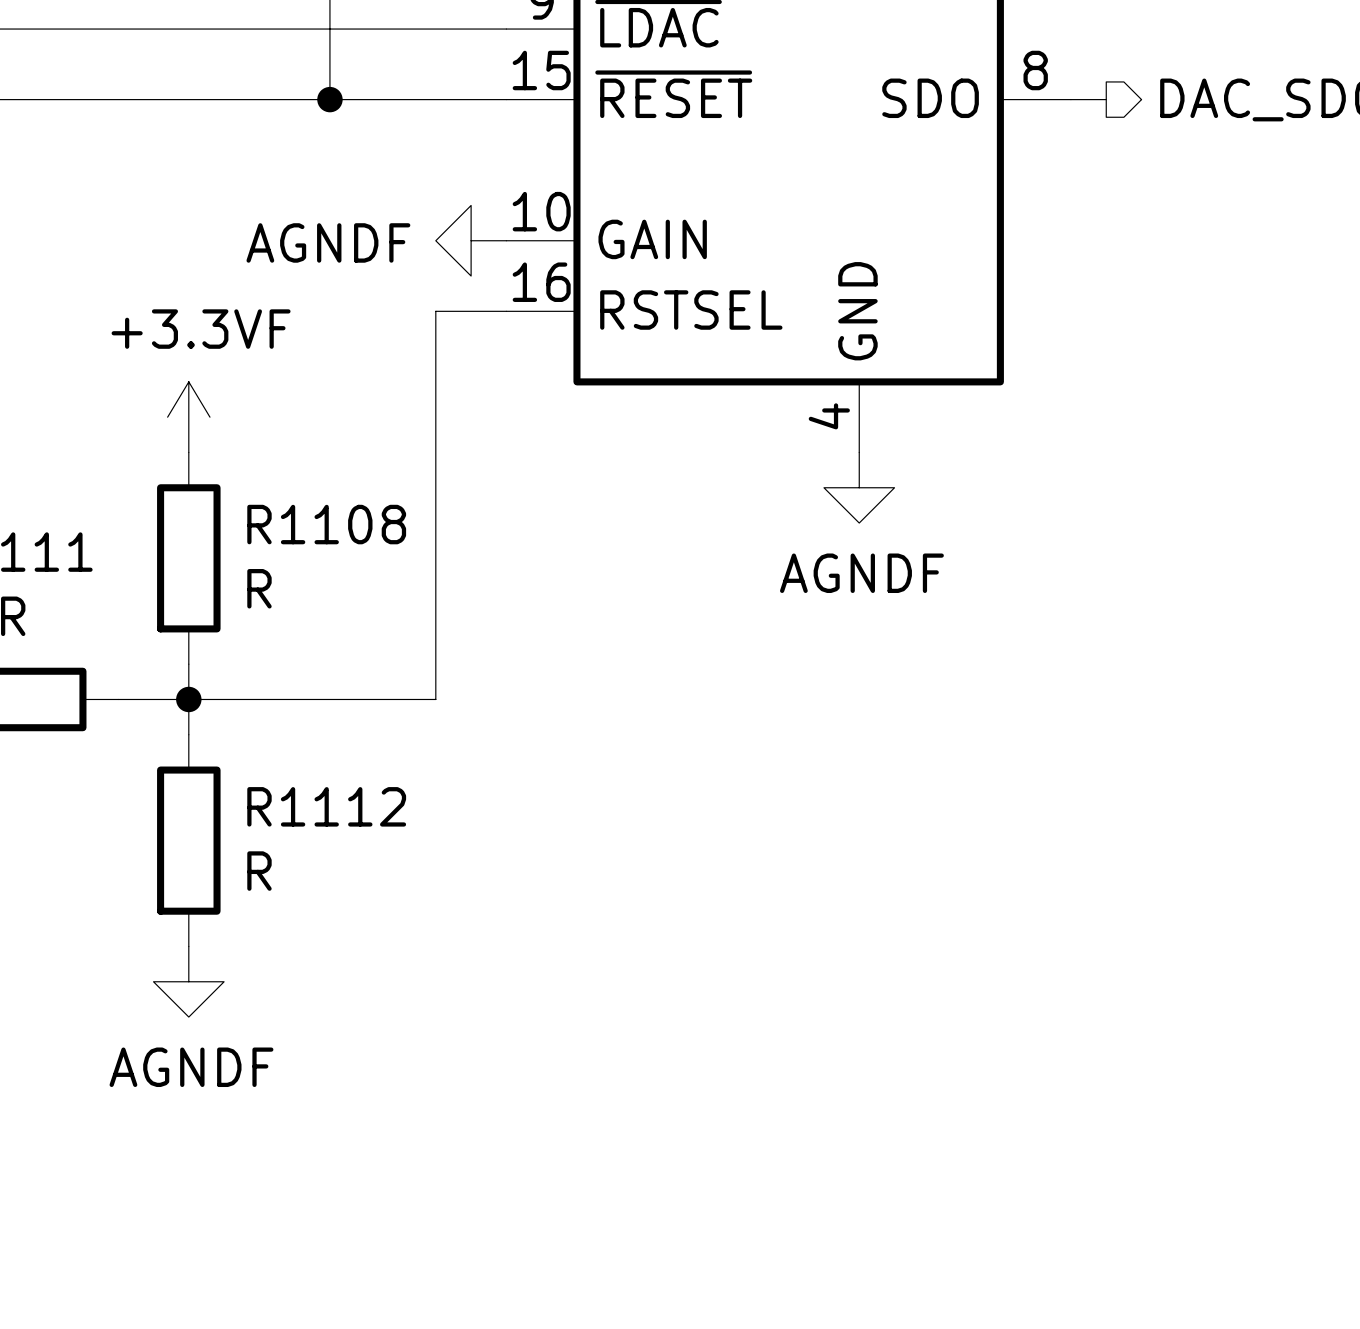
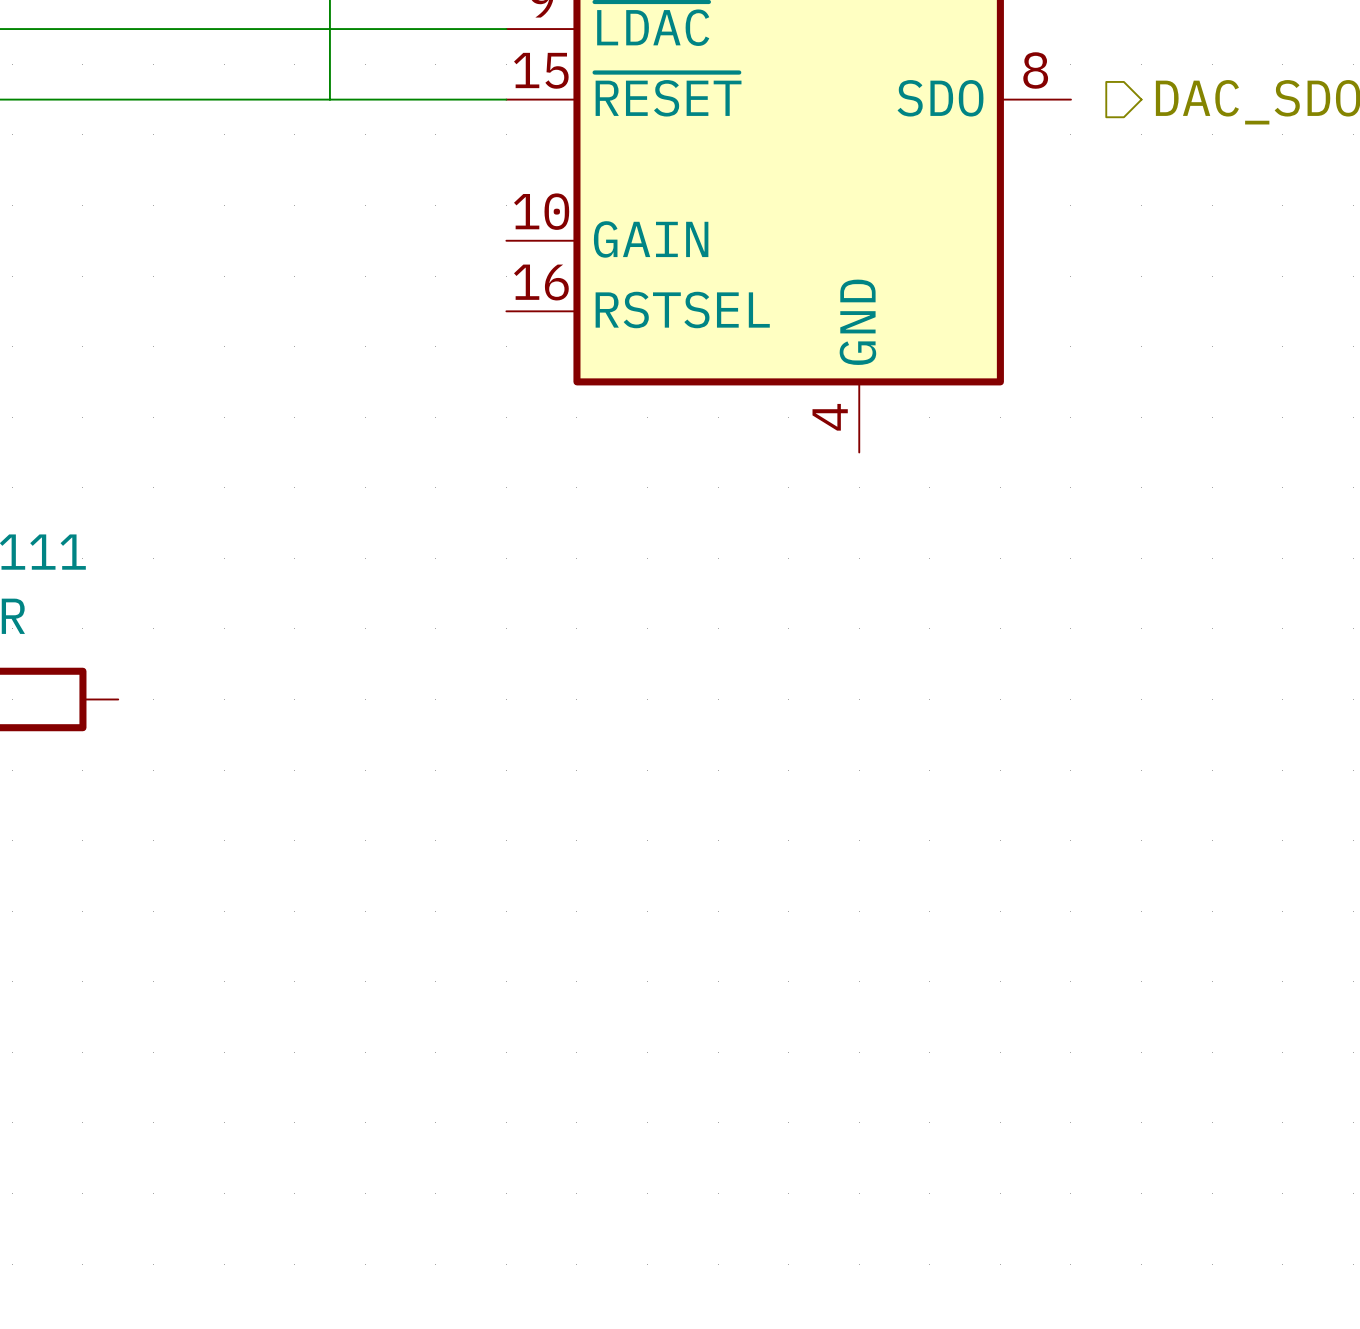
junction: (329, 99) -> none
wire: (1070, 99) (1106, 99) -> none
power symbol: AGNDF (471, 240) -> none
wire: (506, 311) (435, 311) (435, 699) (118, 699) -> none
power symbol: +3.3VF (188, 417) -> none
power symbol: AGNDF (859, 487) -> none
R1108: R (188, 558) -> none
wire: (188, 664) (188, 734) -> none
junction: (188, 699) -> none
R1112: R (188, 840) -> none
power symbol: AGNDF (188, 981) -> none

